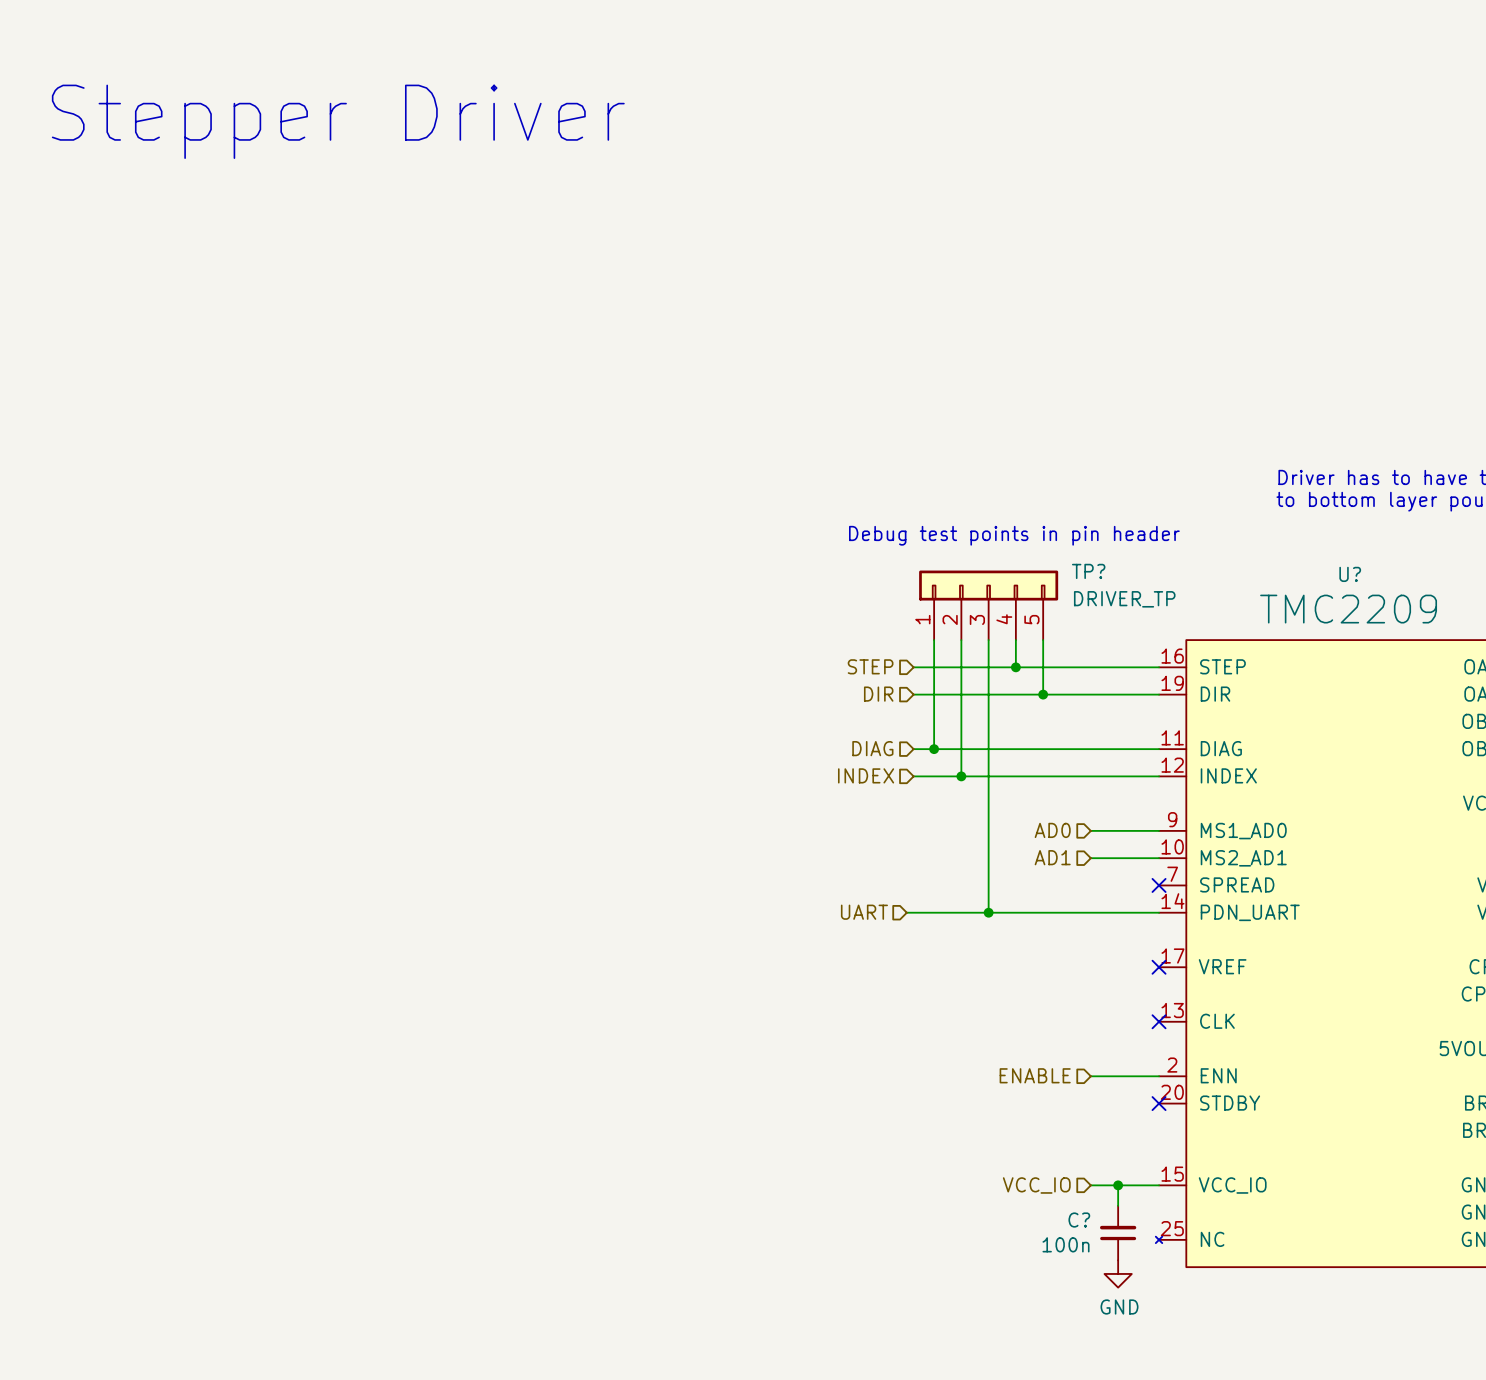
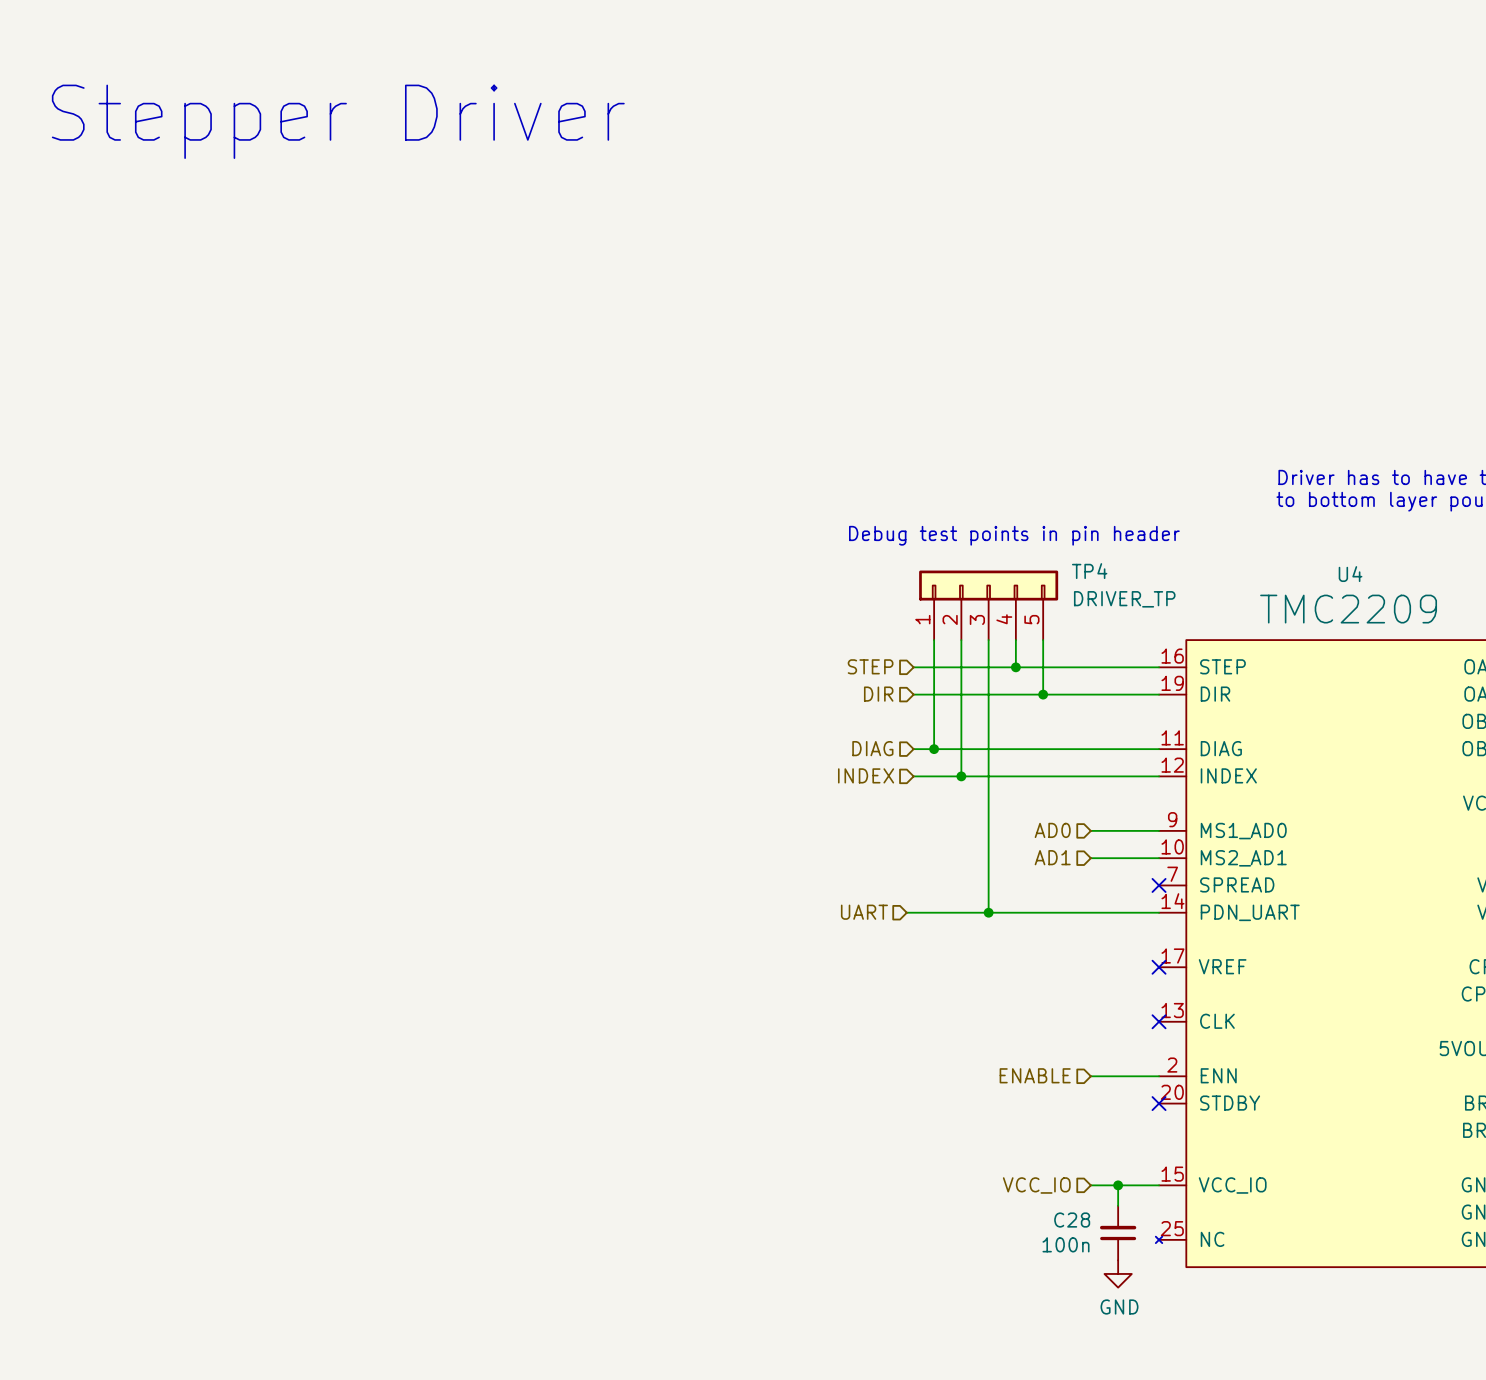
TP? name: TP? (1088, 571) -> TP4 (1089, 571)
U? name: U? (1350, 574) -> U4 (1350, 574)
C? name: C? (1079, 1220) -> C28 (1072, 1220)

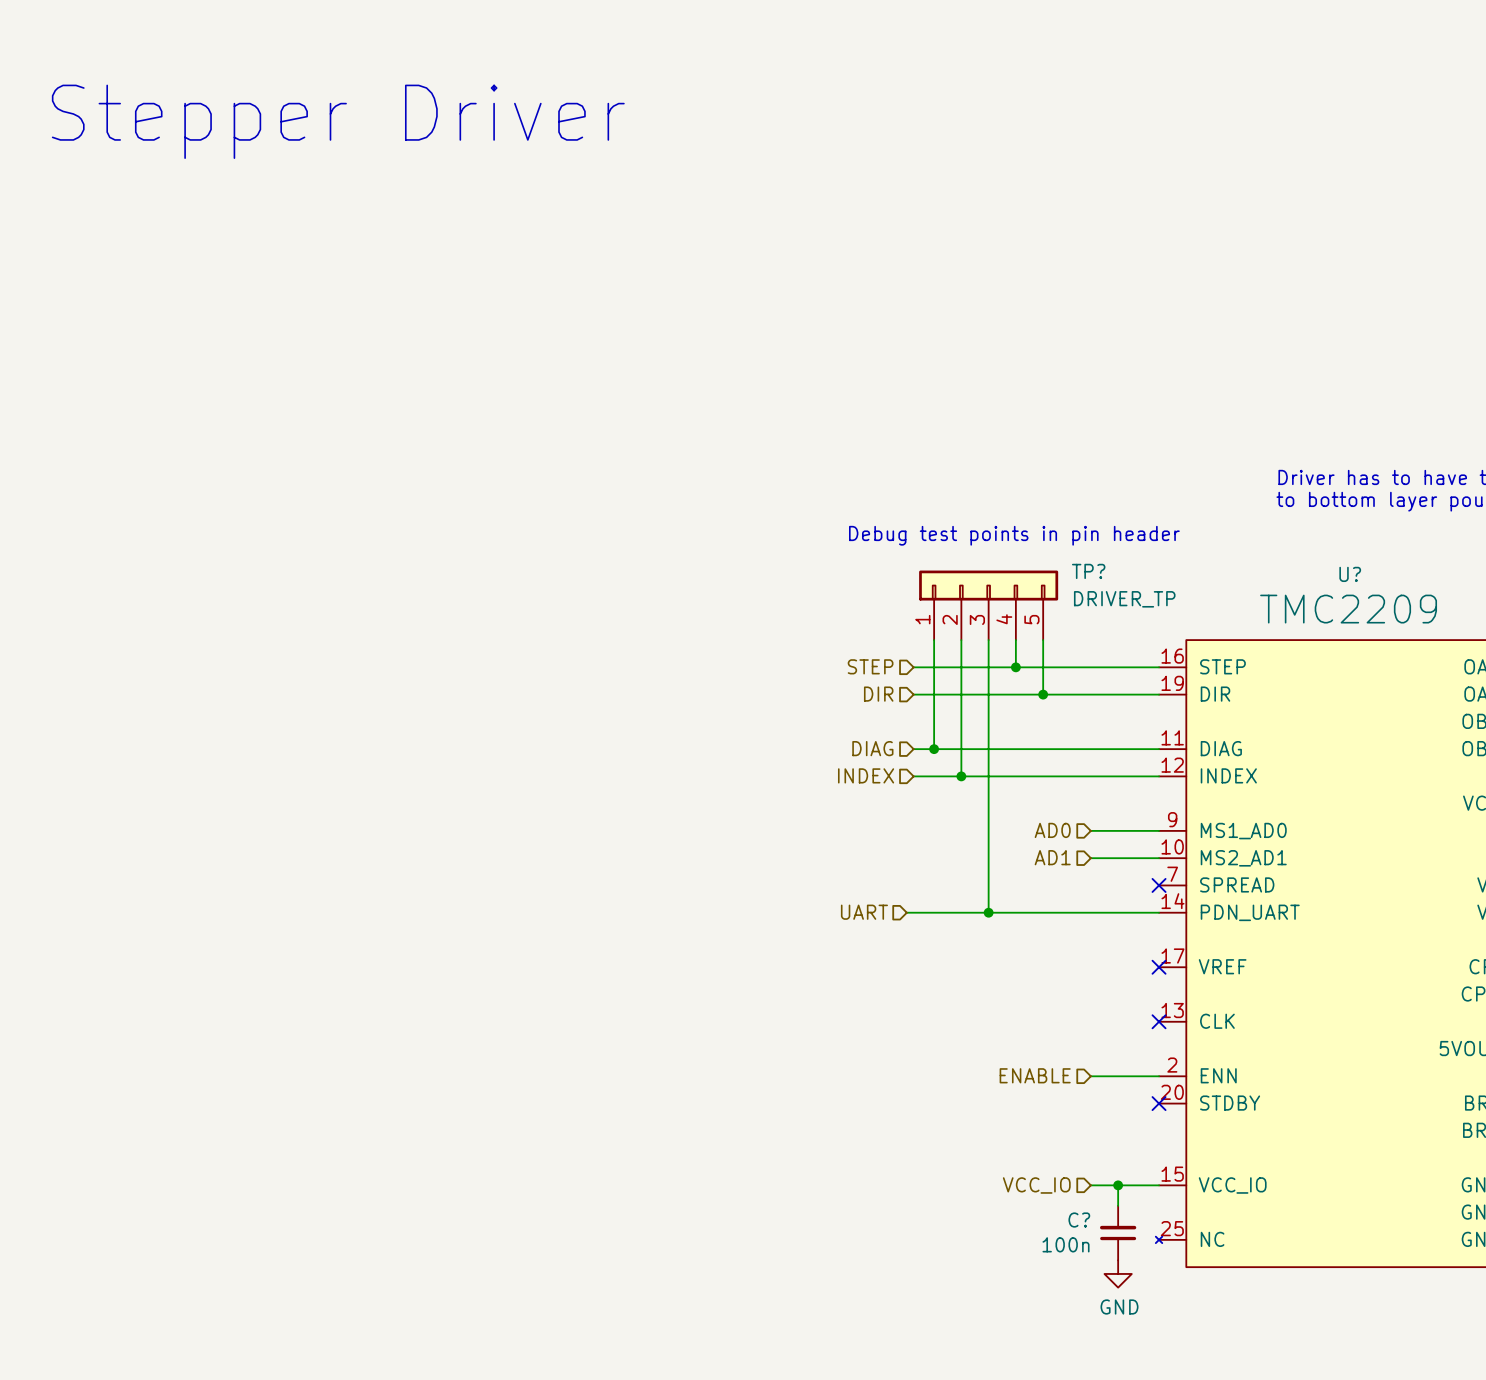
TP4 name: TP4 (1089, 571) -> TP? (1088, 571)
U4 name: U4 (1350, 574) -> U? (1350, 574)
C28 name: C28 (1072, 1220) -> C? (1079, 1220)

